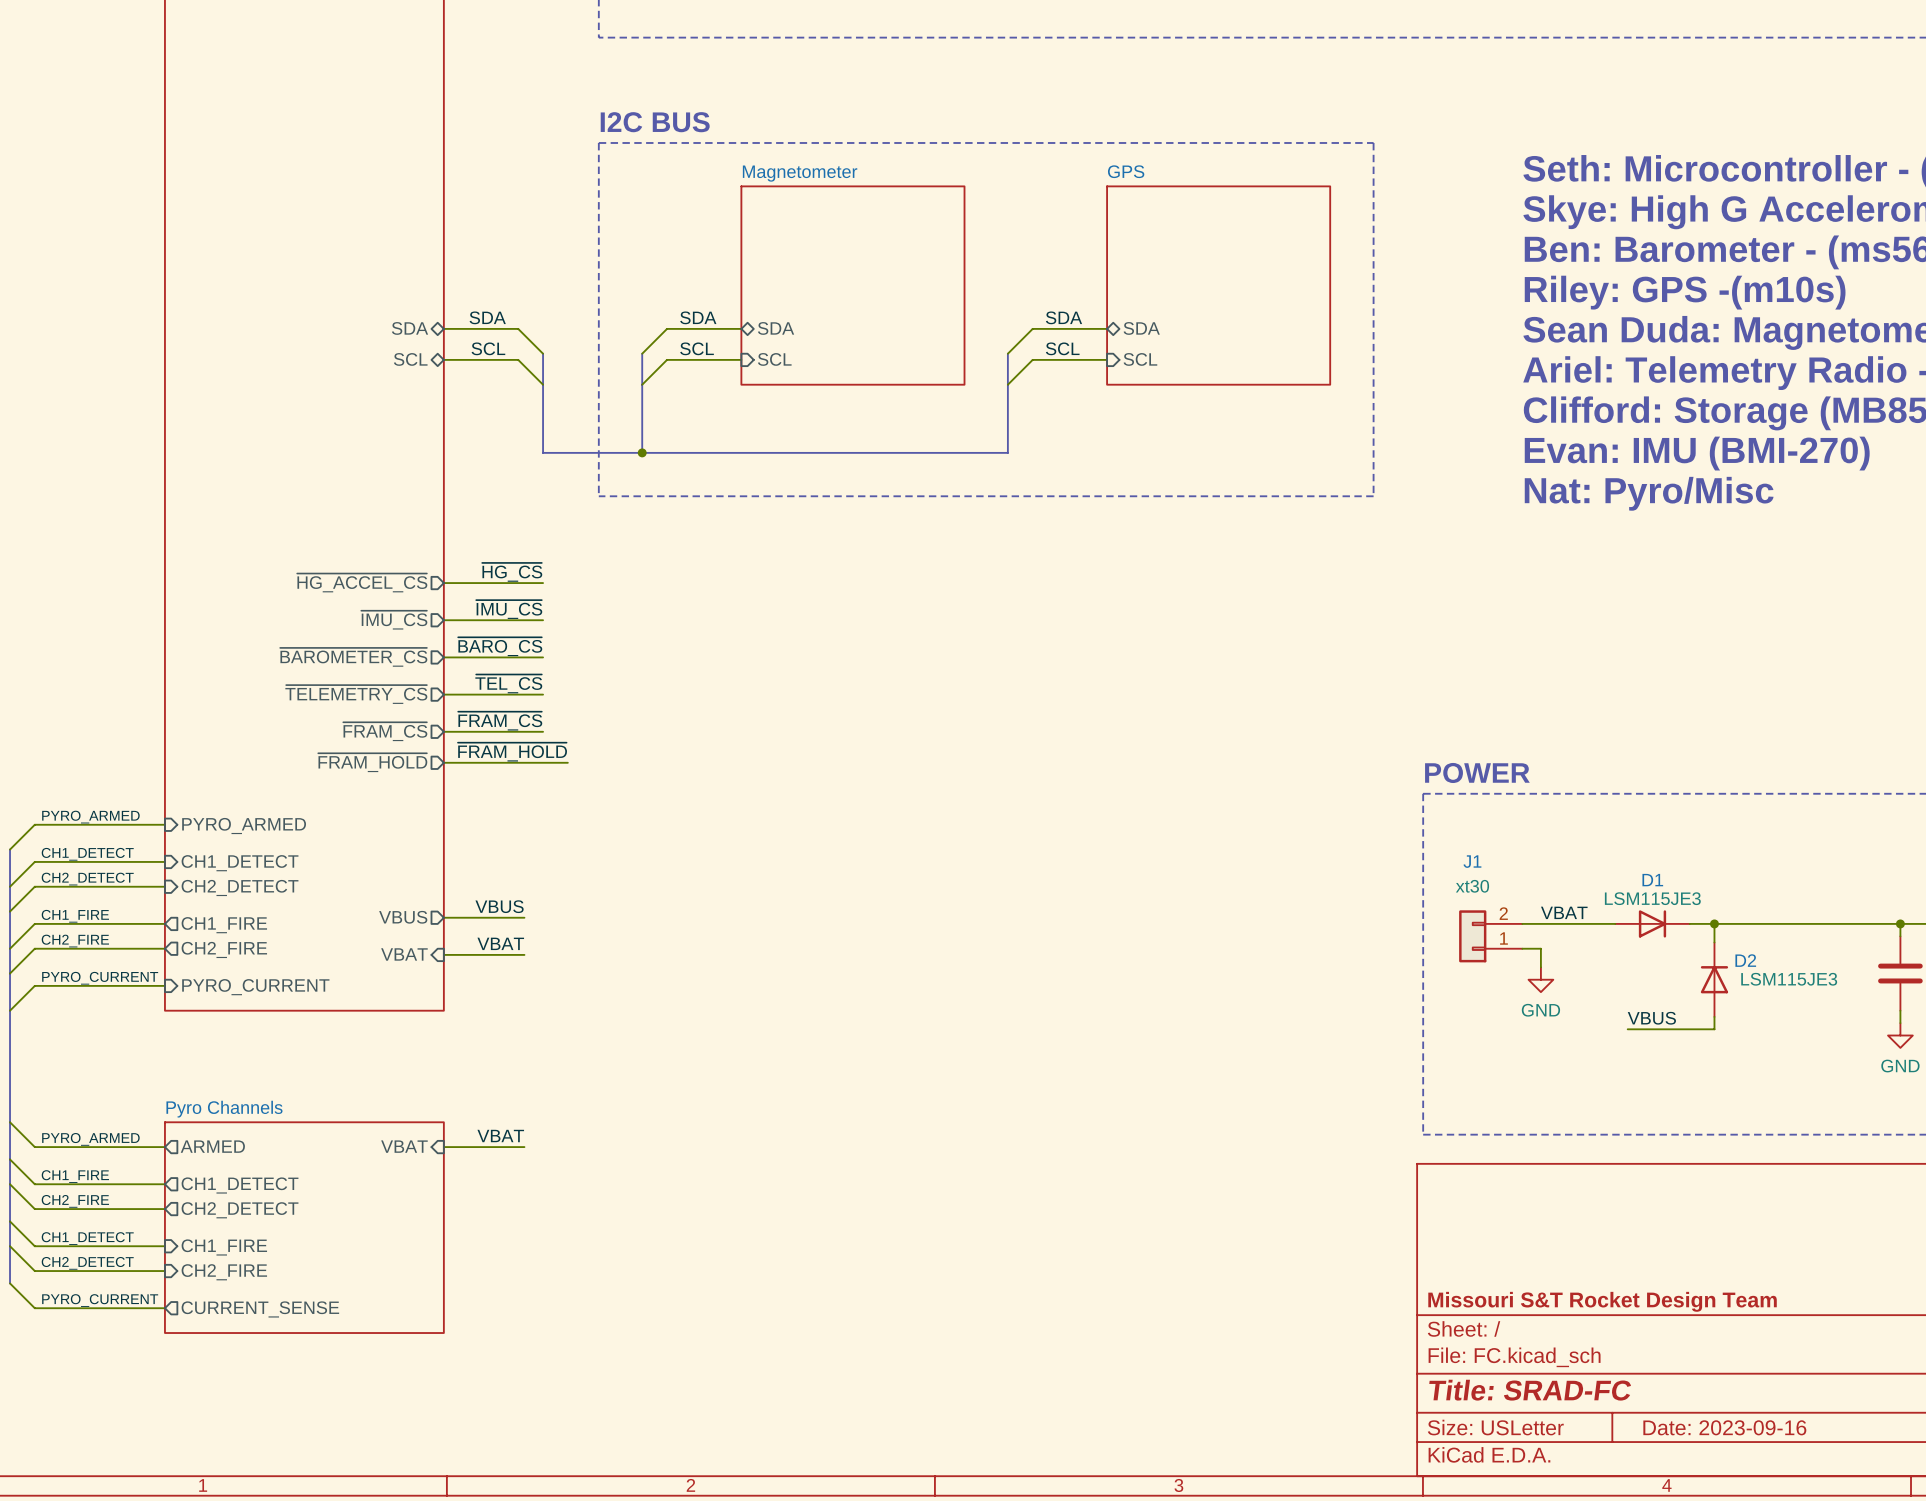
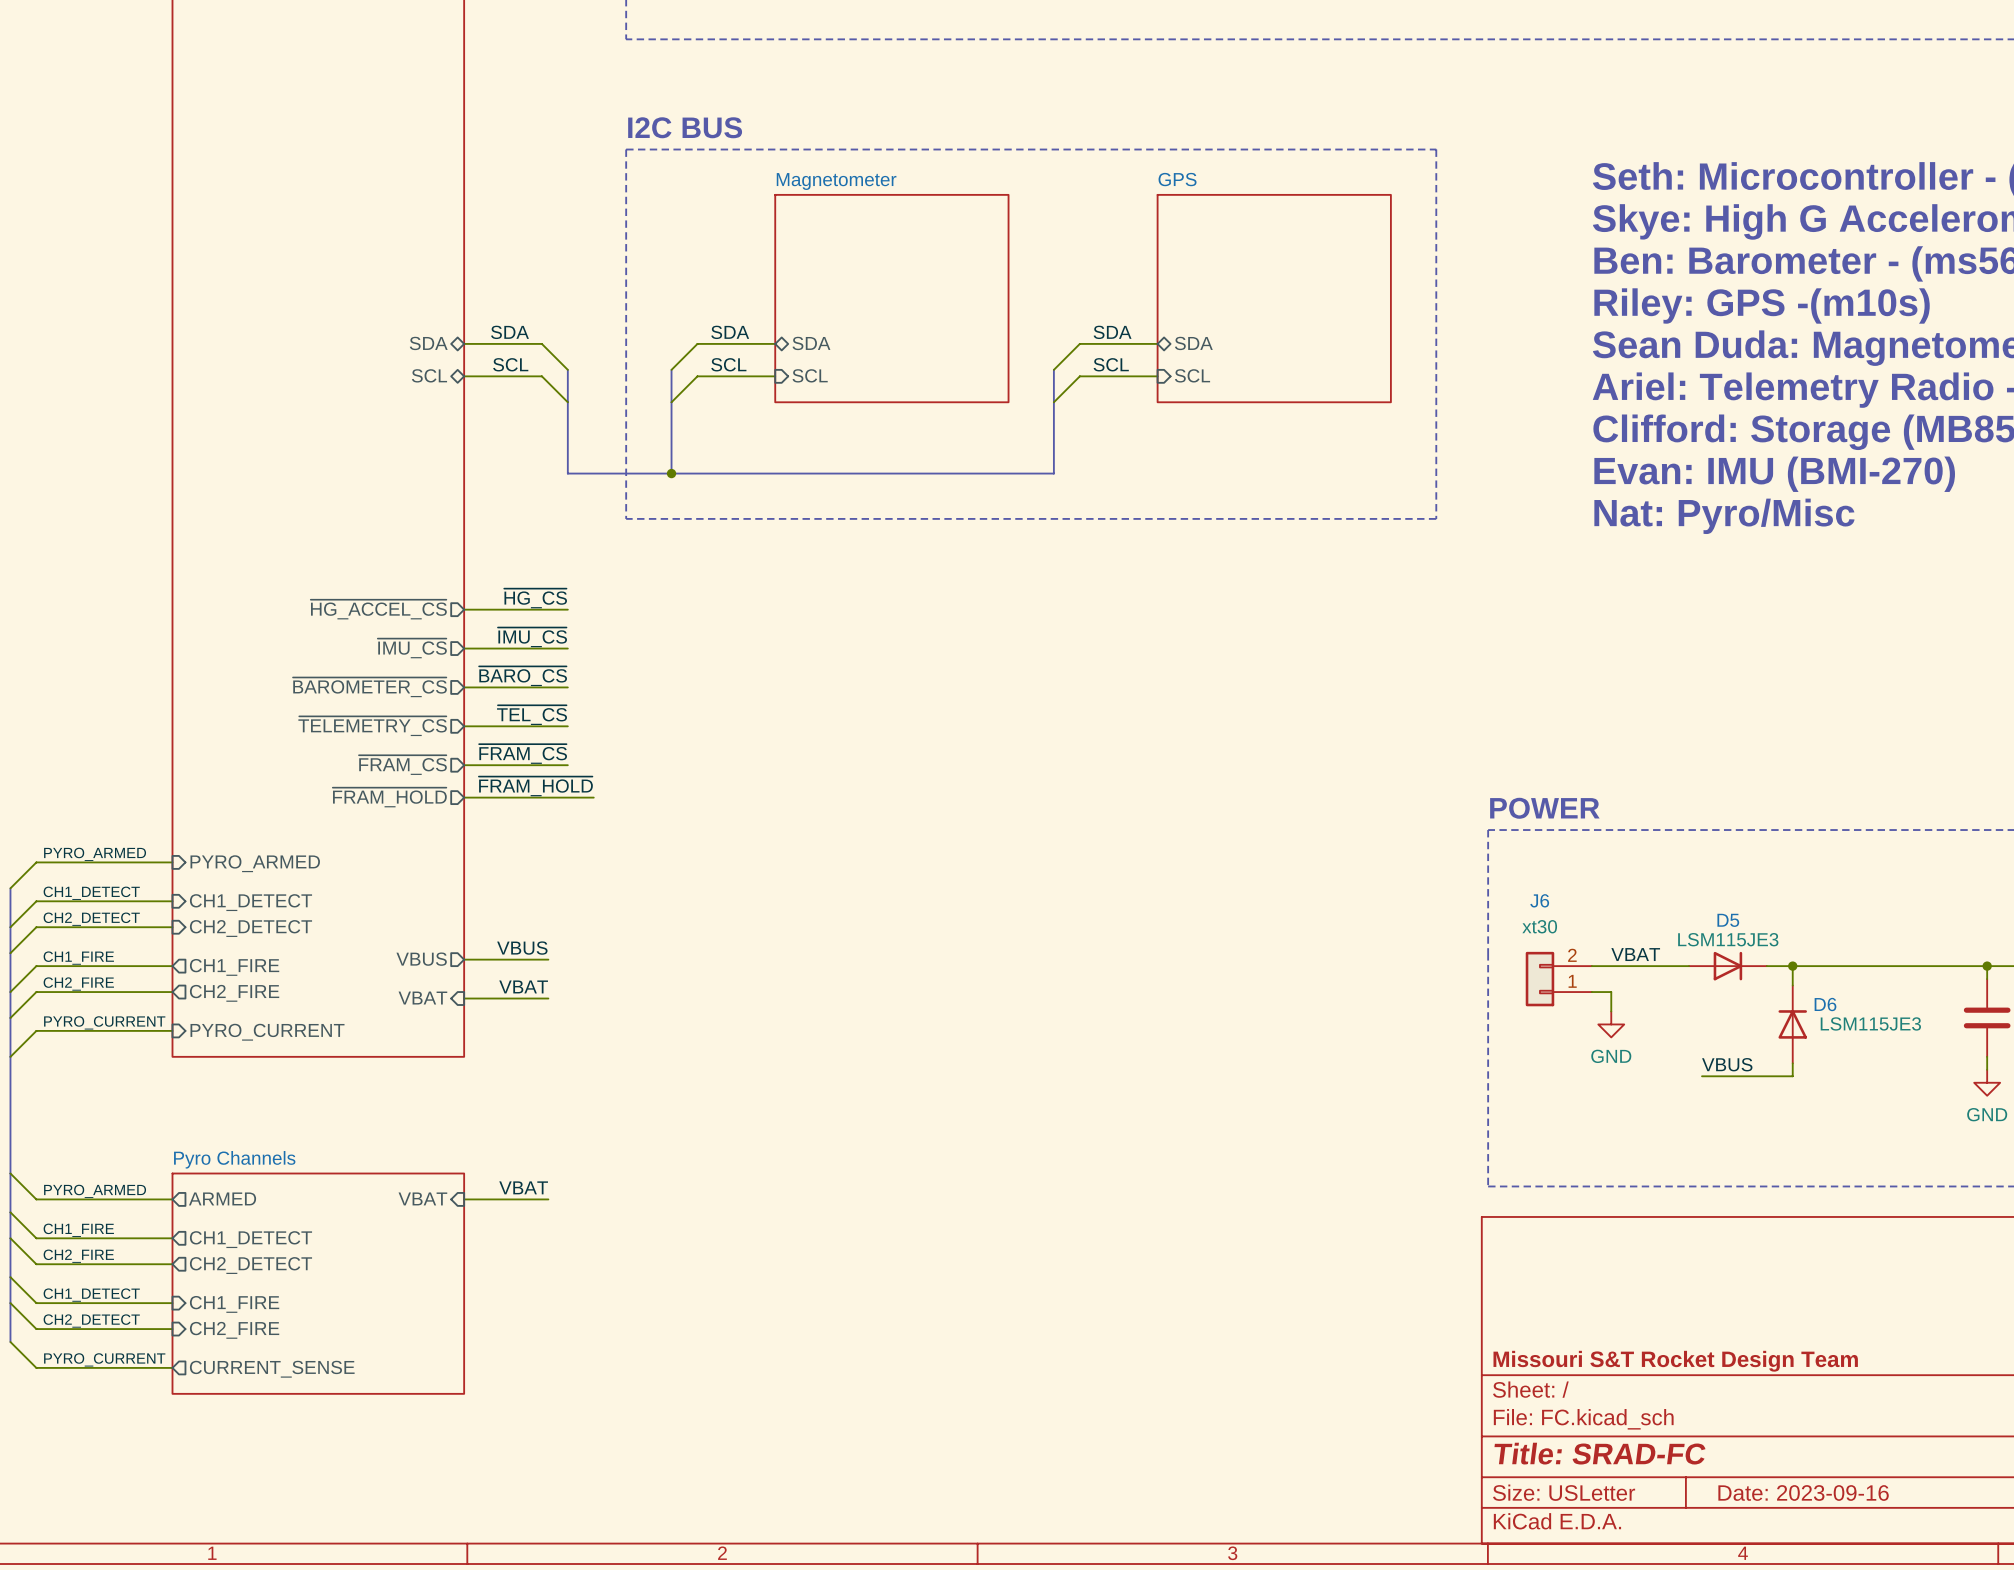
J1 name: J1 (1472, 861) -> J6 (1539, 900)
D1 name: D1 (1652, 880) -> D5 (1728, 920)
D2 name: D2 (1745, 960) -> D6 (1825, 1004)

